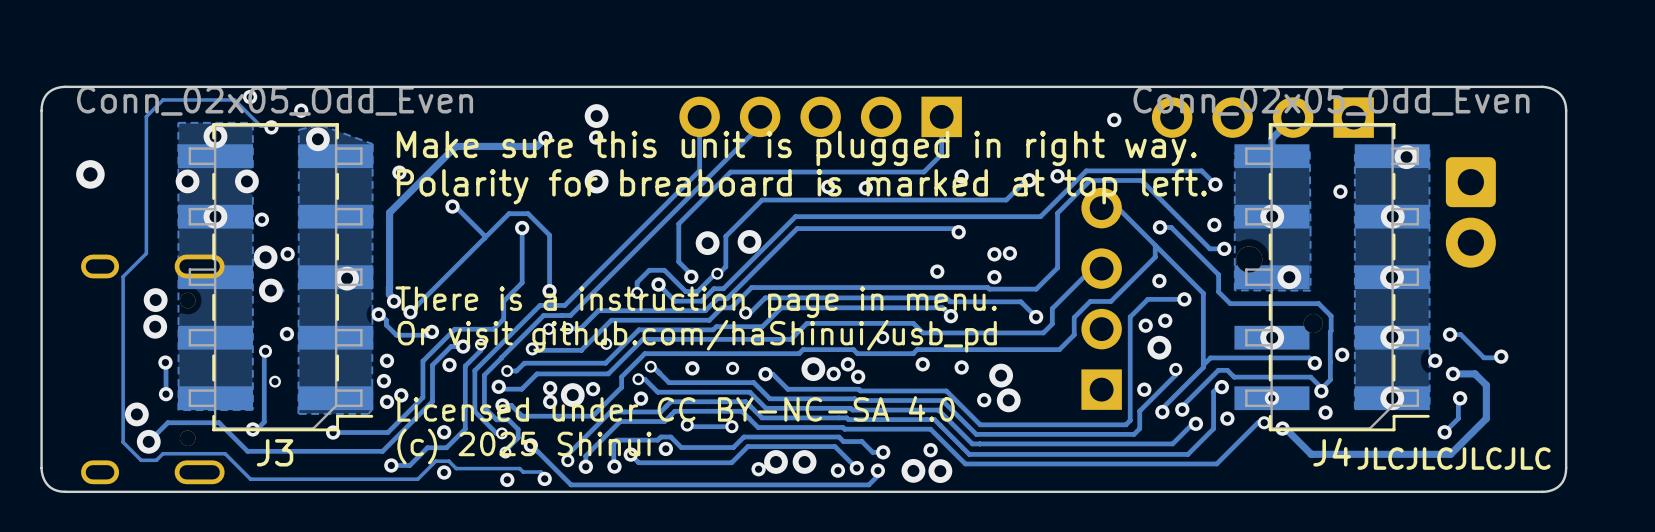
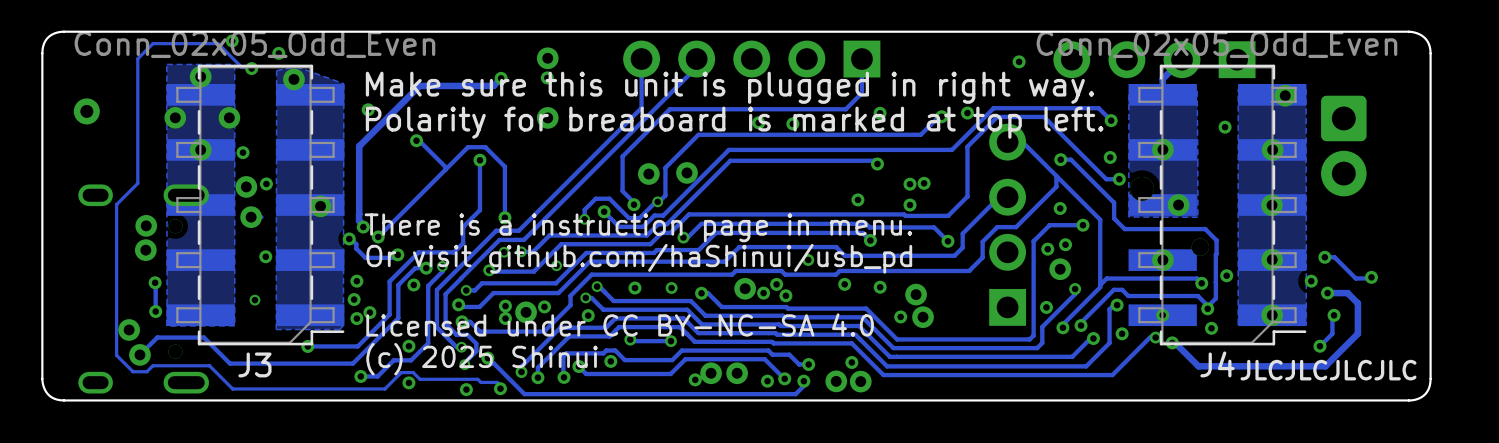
track: (265, 351) (264, 422) (256, 429) (252, 429) -> none
via: (265, 351) -> none
via: (252, 429) -> none

